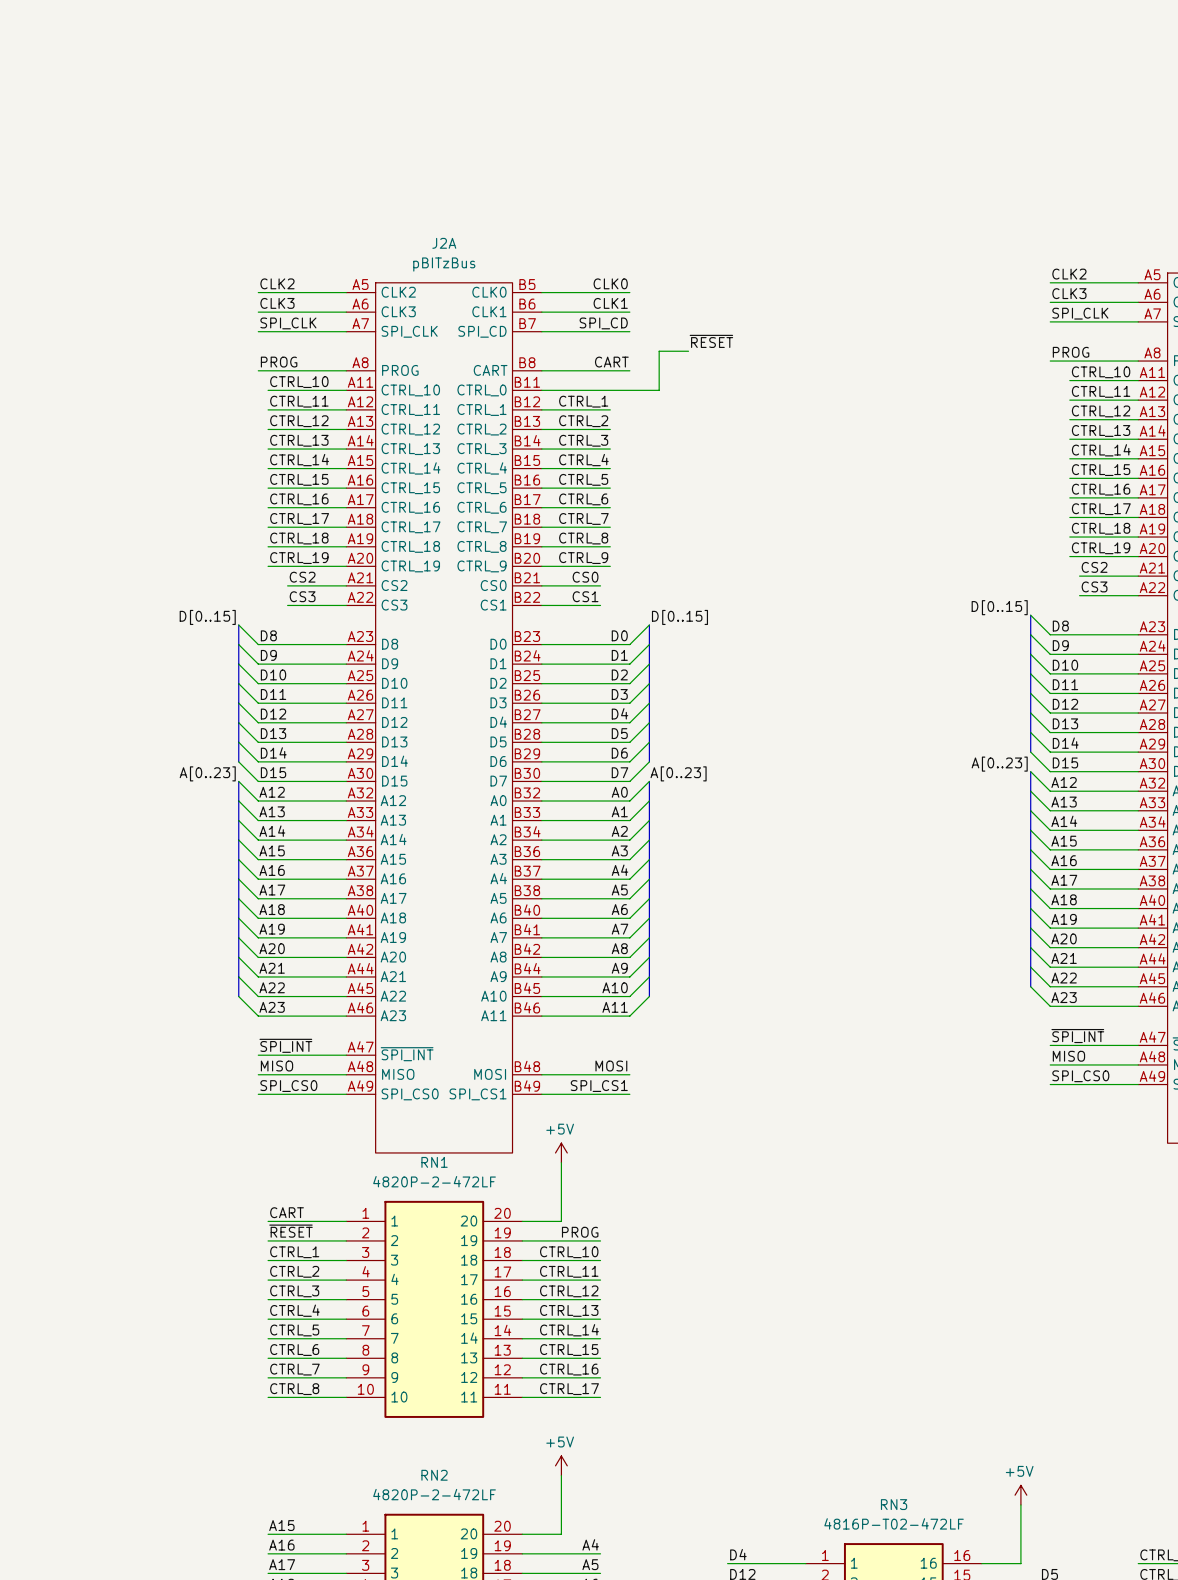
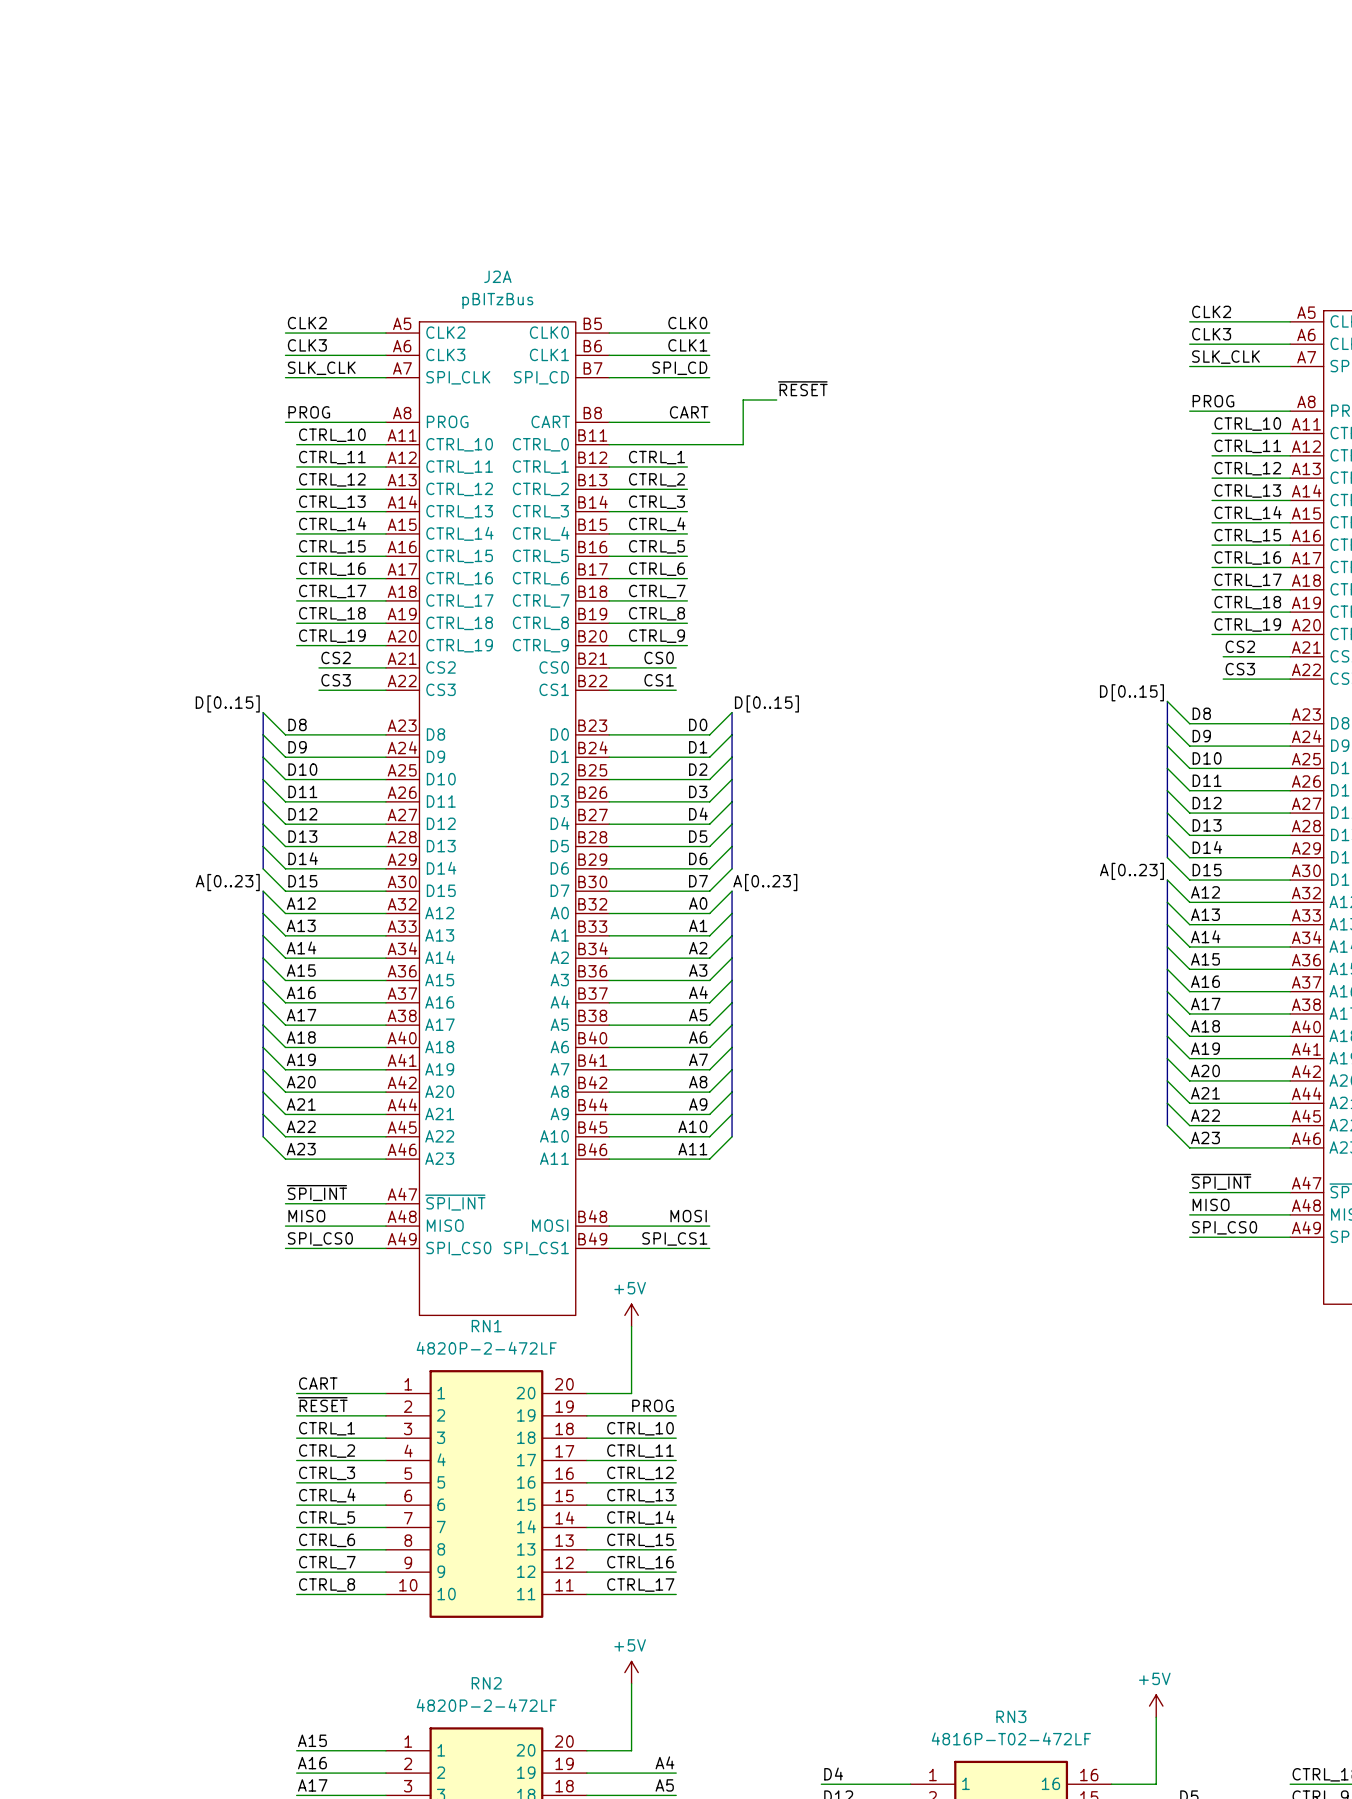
label: SPI_CLK (1080, 313) -> SLK_CLK (1225, 357)
label: SPI_CLK (288, 323) -> SLK_CLK (321, 368)

